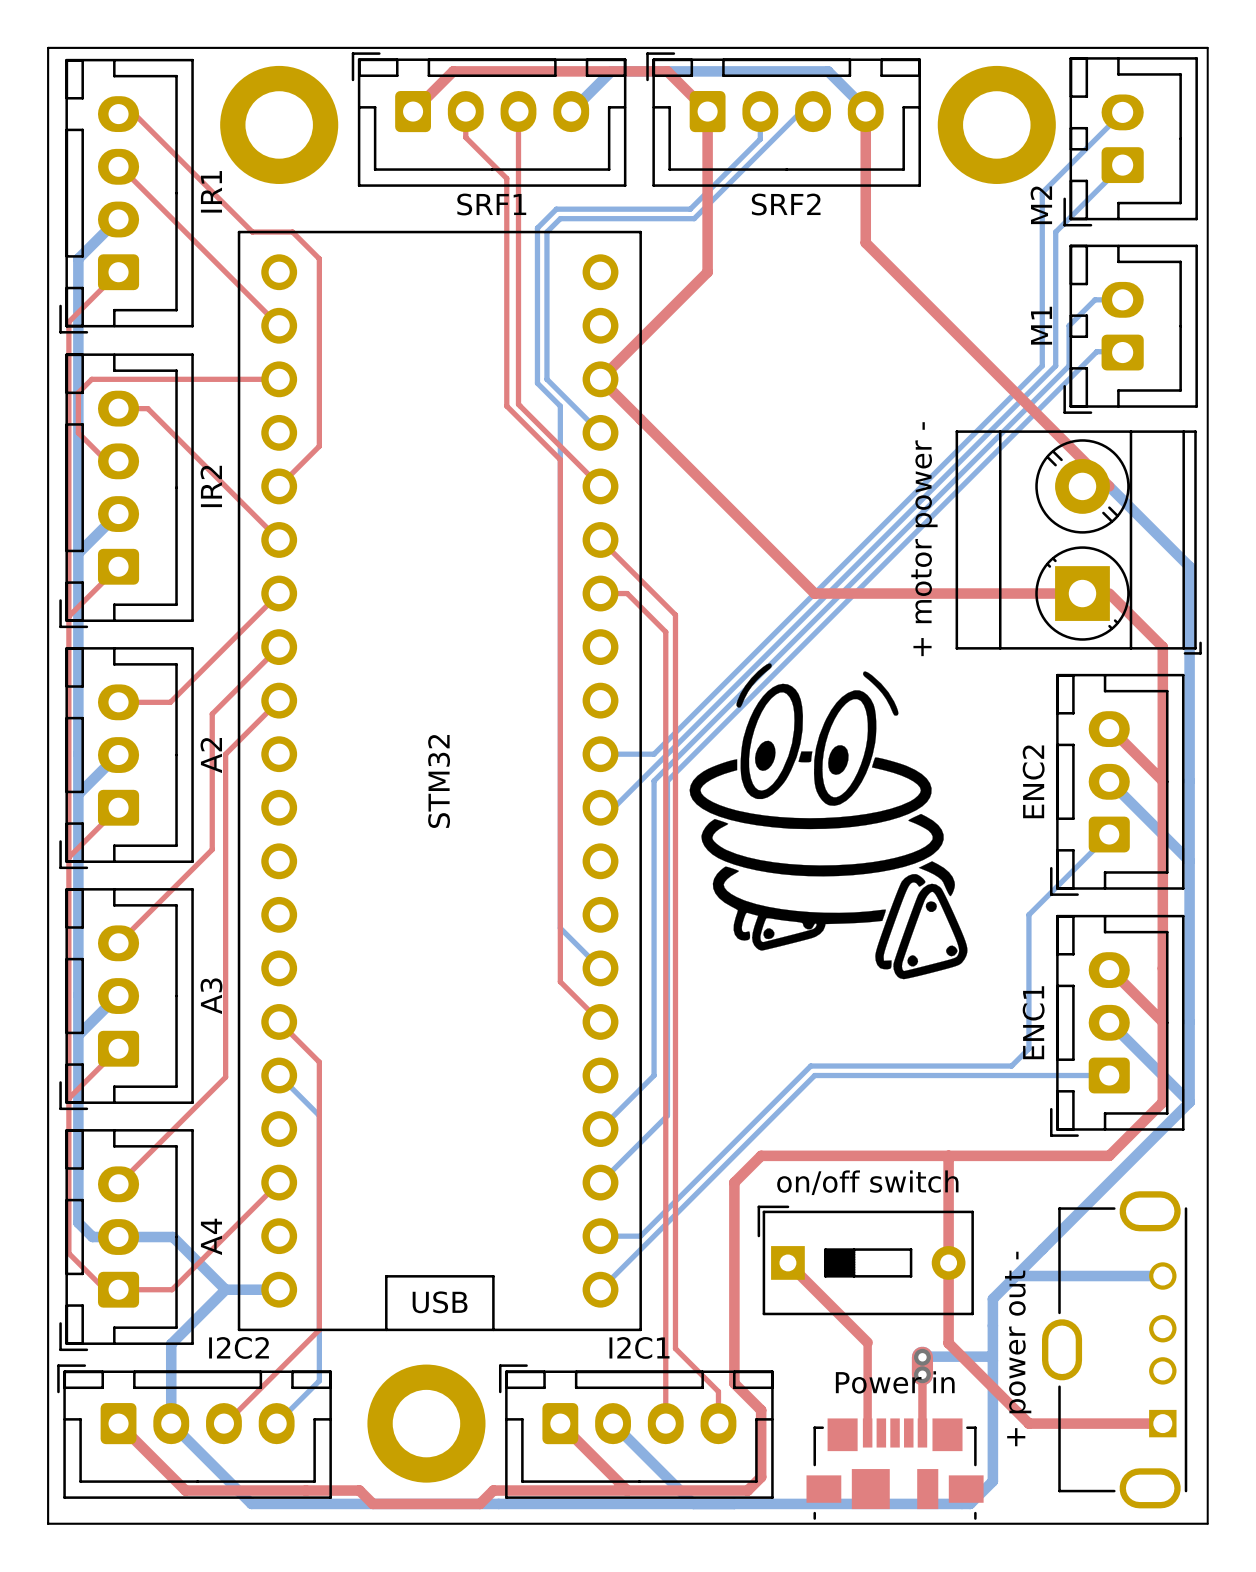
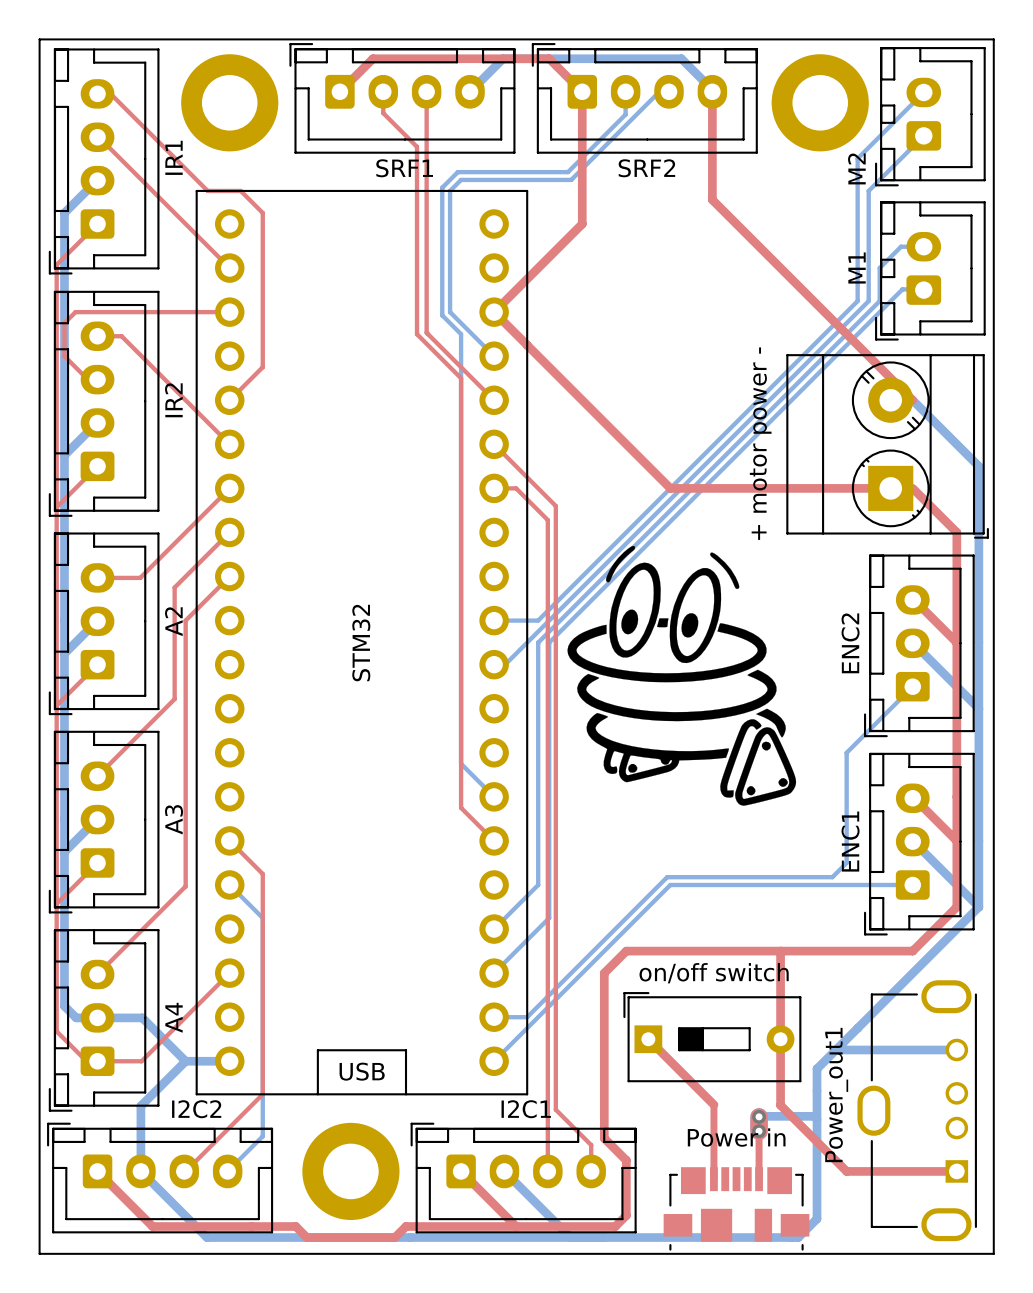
Power_out1 name: none -> Power_out1 (836, 1095)
Power_out1 value: + power out - (1018, 1348) -> none

